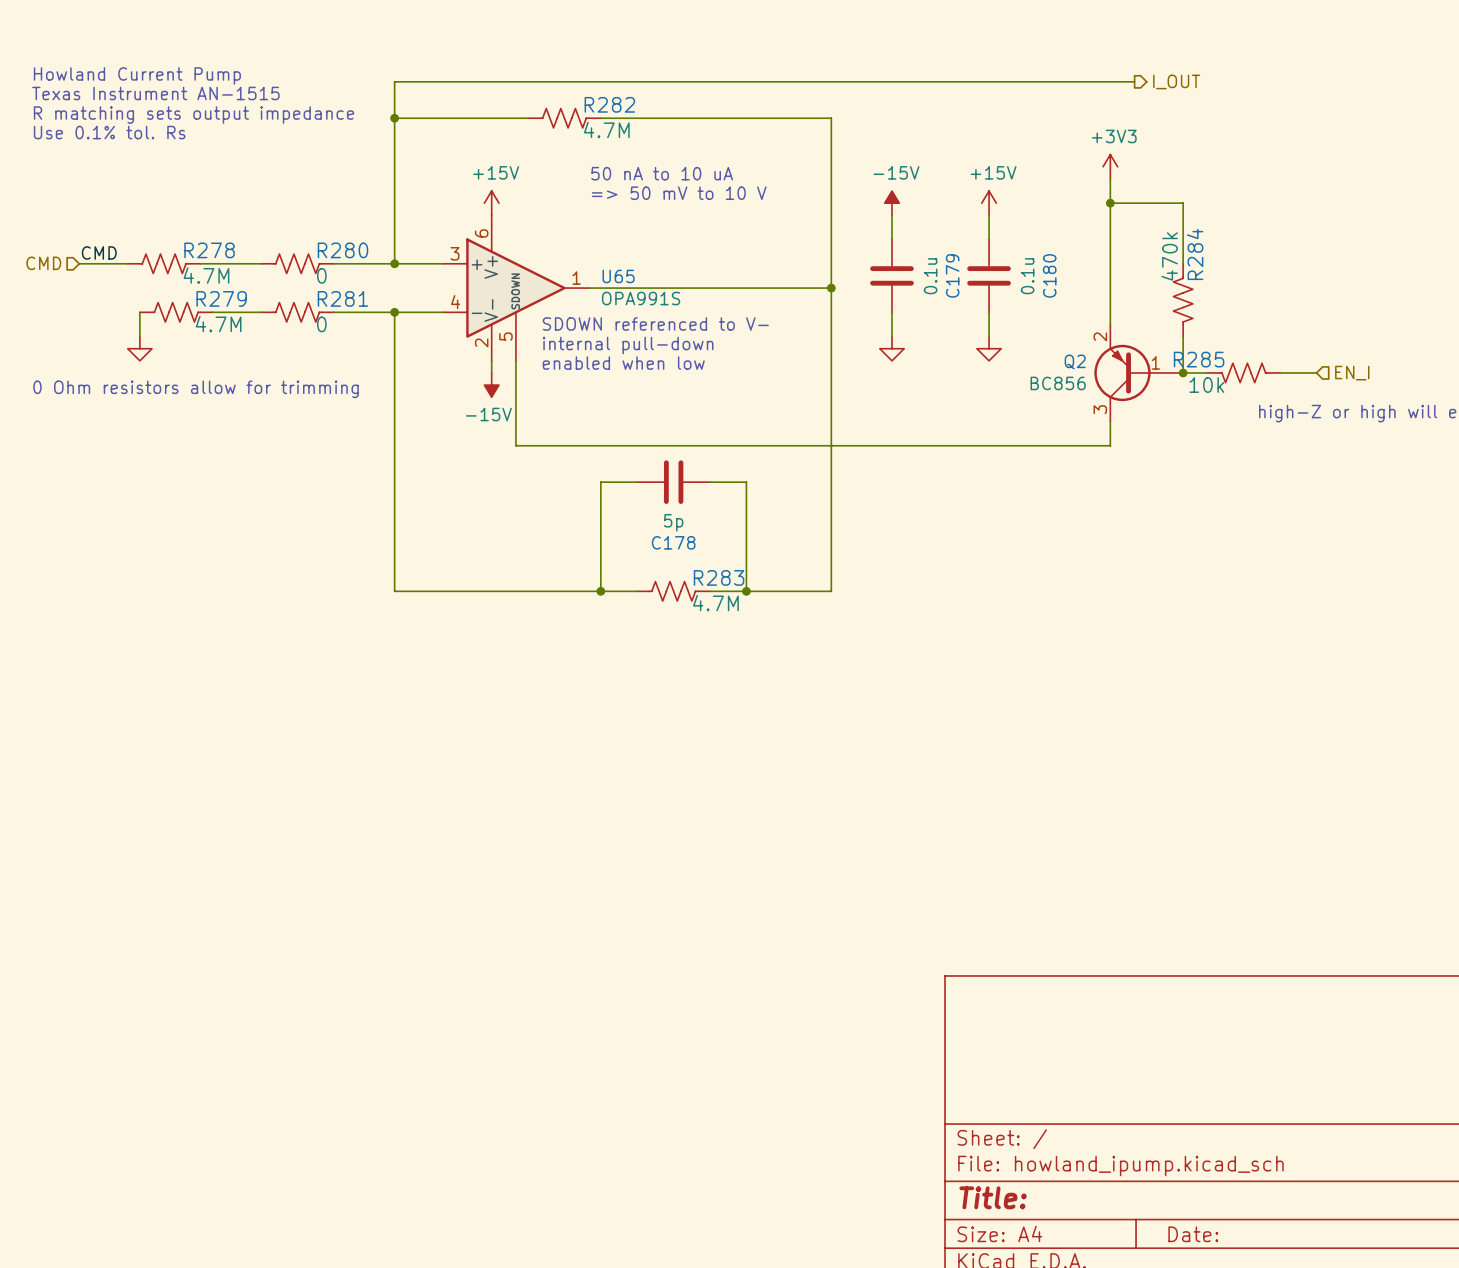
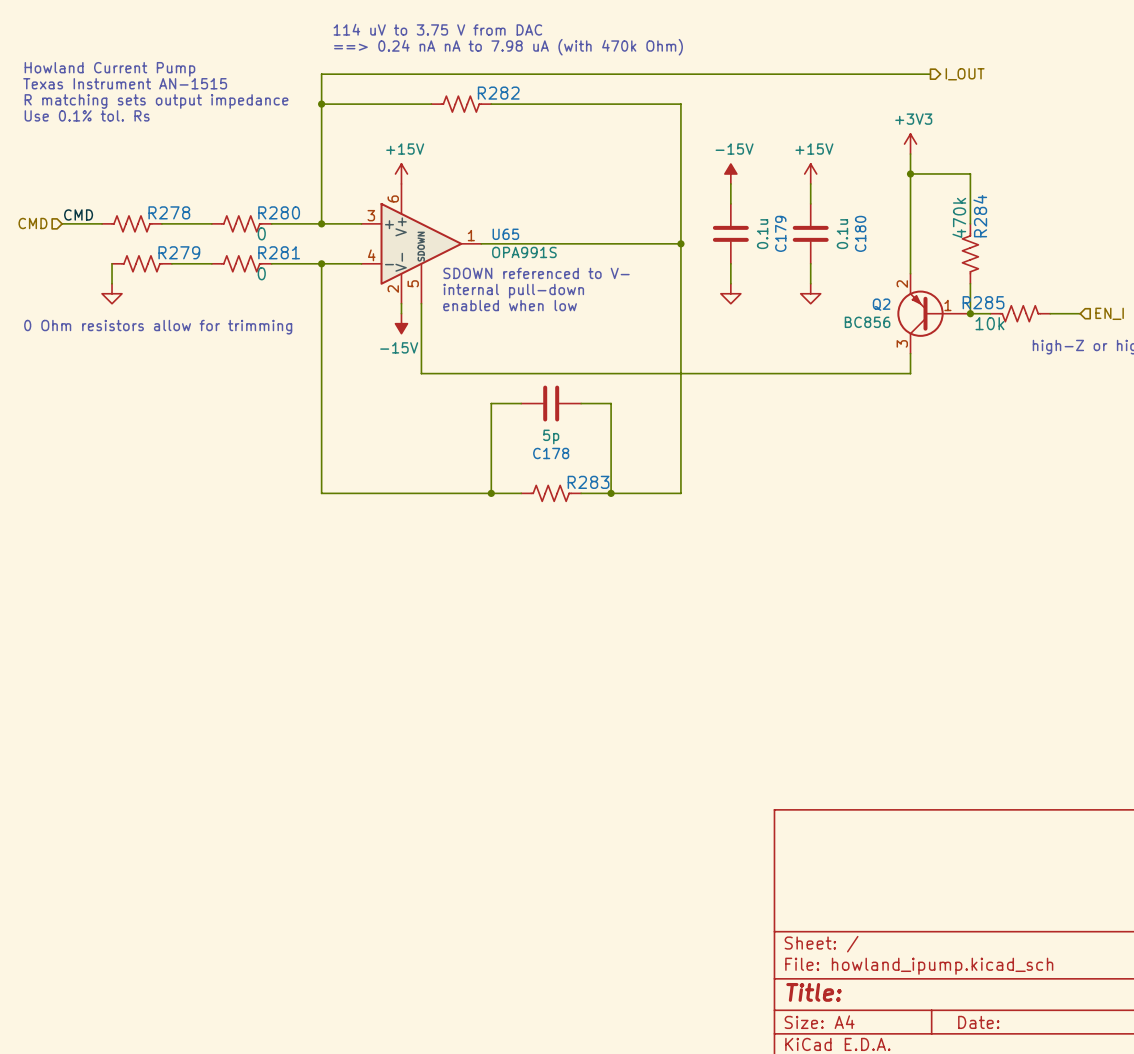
text: none -> 114 uV to 3.75 V from DAC (437, 29)
text: none -> ==> 0.24 nA nA to 7.98 uA (with 470k Ohm) (508, 47)
R282 value: 4.7M (606, 129) -> none
text: 50 nA to 10 uA (662, 173) -> none
text: => 50 mV to 10 V (679, 193) -> none
R278 value: 4.7M (206, 275) -> none
R279 value: 4.7M (218, 324) -> none
R283 value: 4.7M (715, 603) -> none

